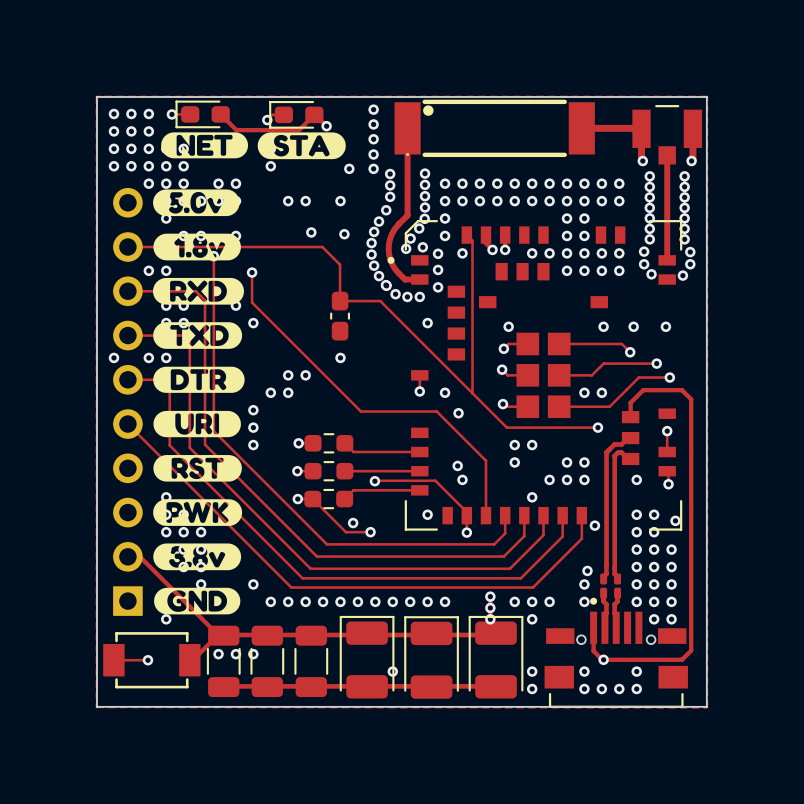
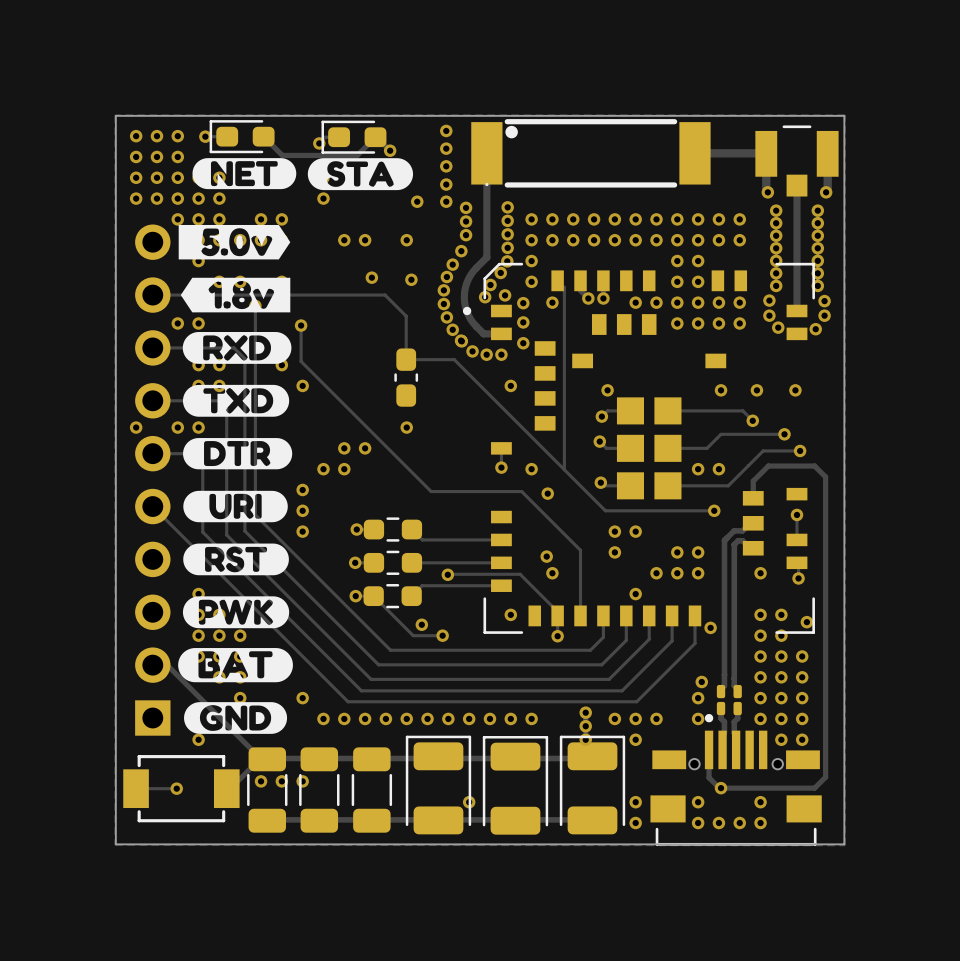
drawing shape: [153, 189, 240, 217] -> [178, 224, 291, 260]
drawing shape: [153, 233, 241, 261] -> [180, 277, 291, 313]
drawing shape: [153, 543, 242, 571] -> [178, 648, 293, 683]

